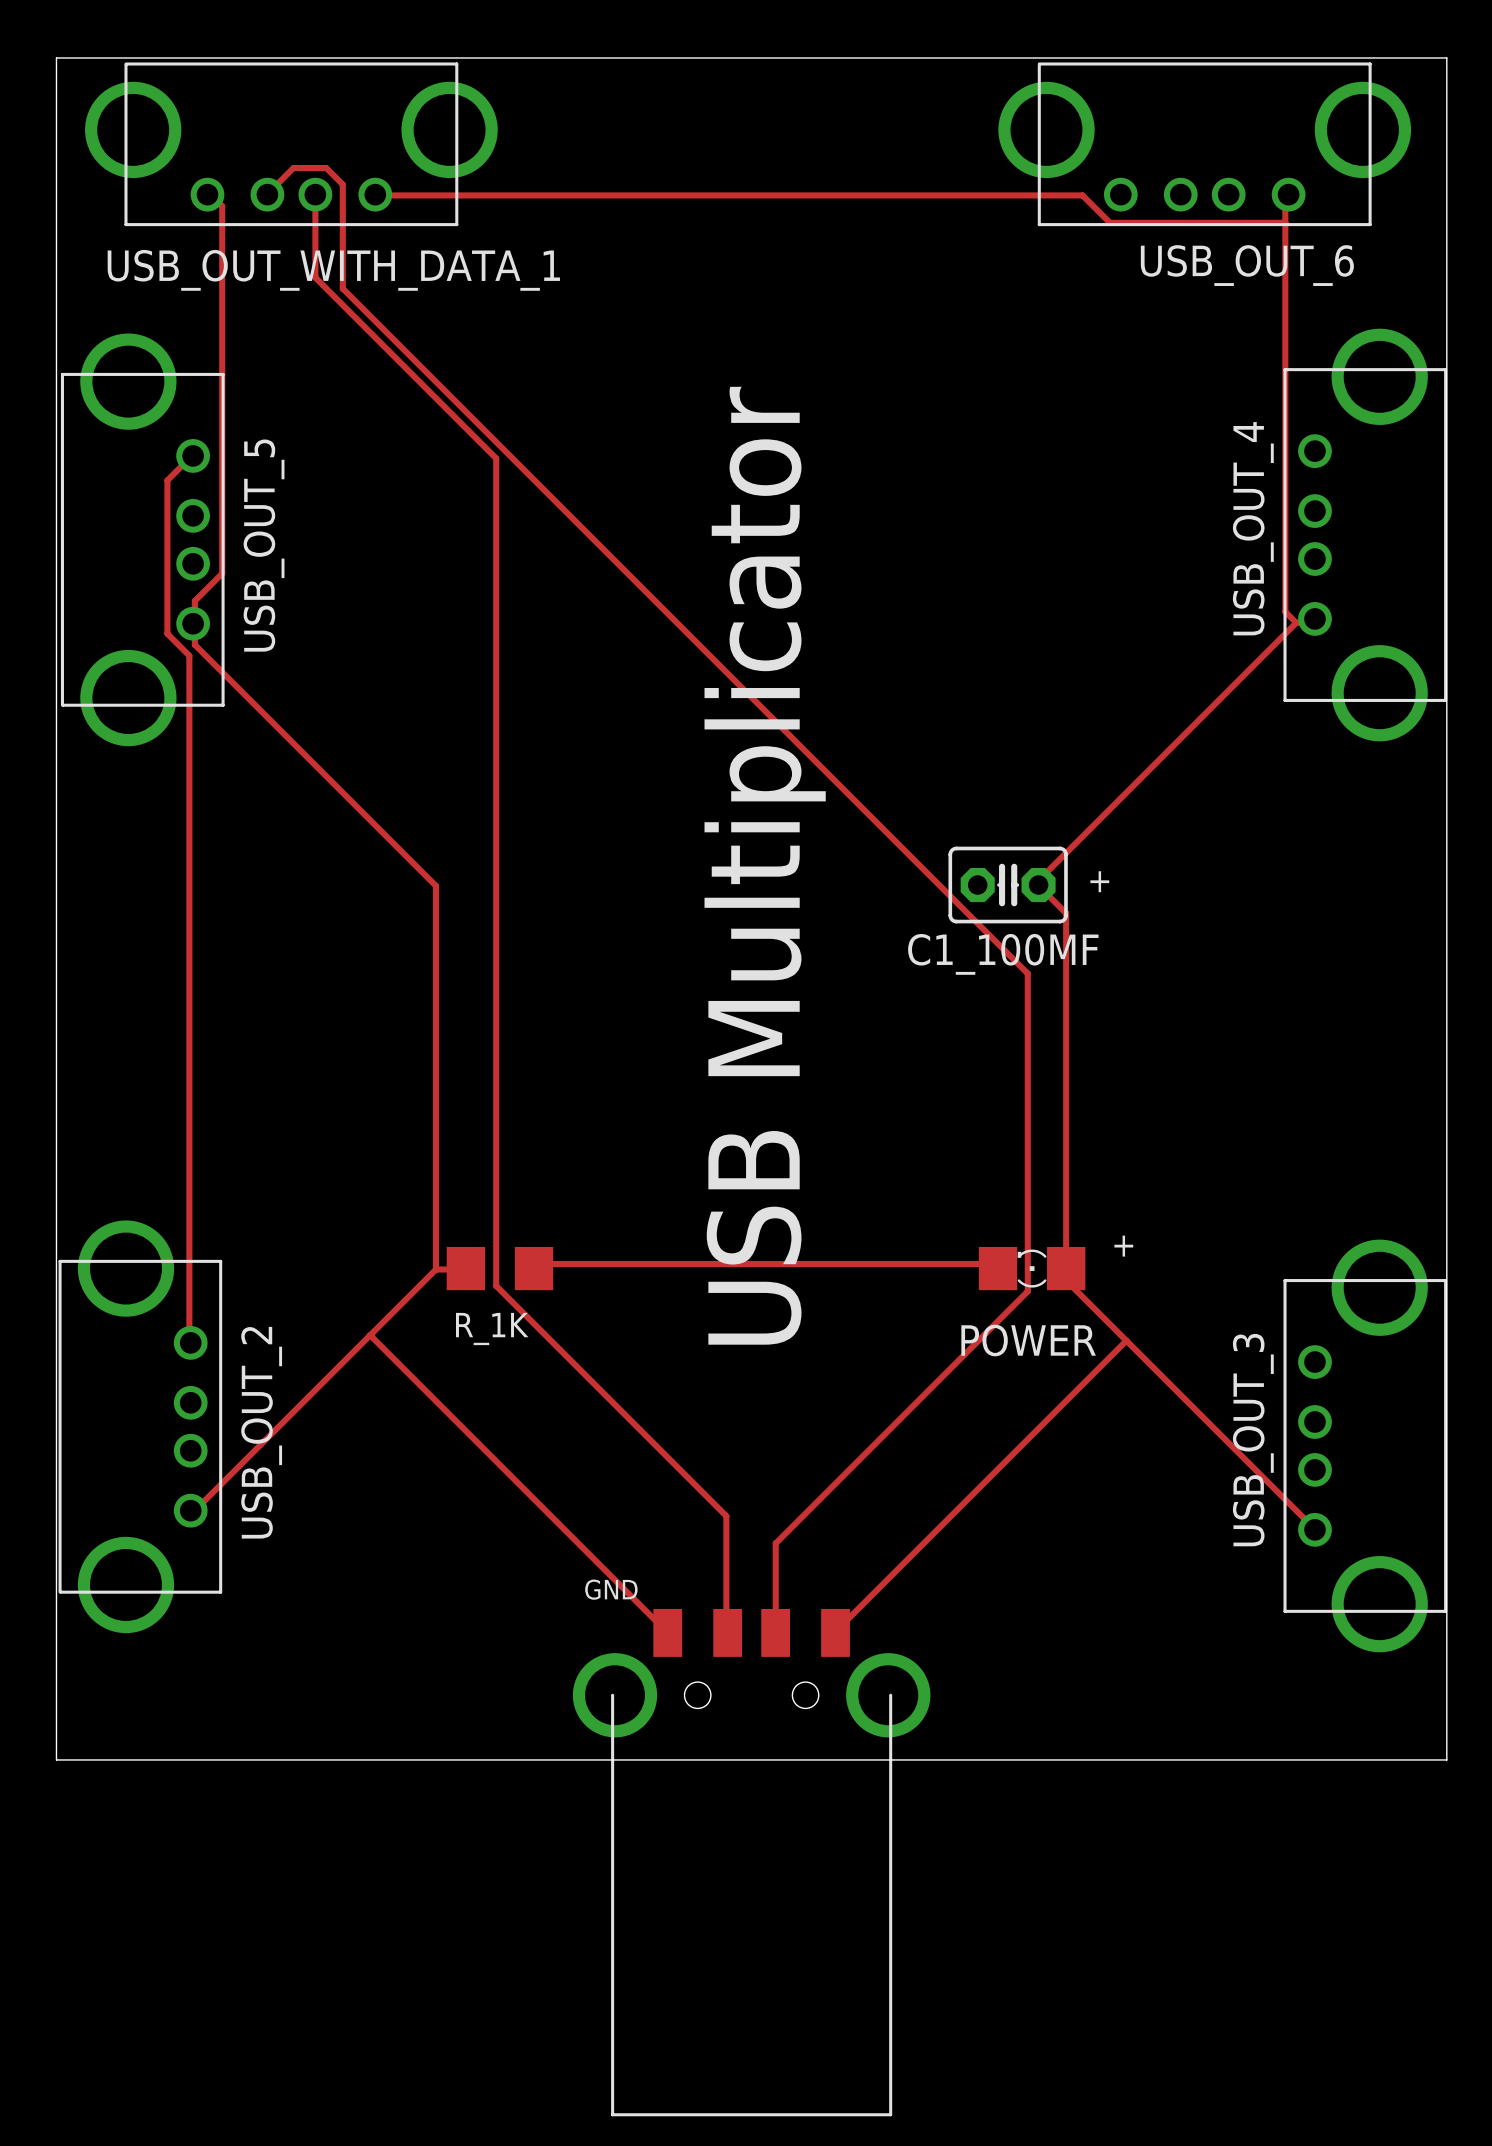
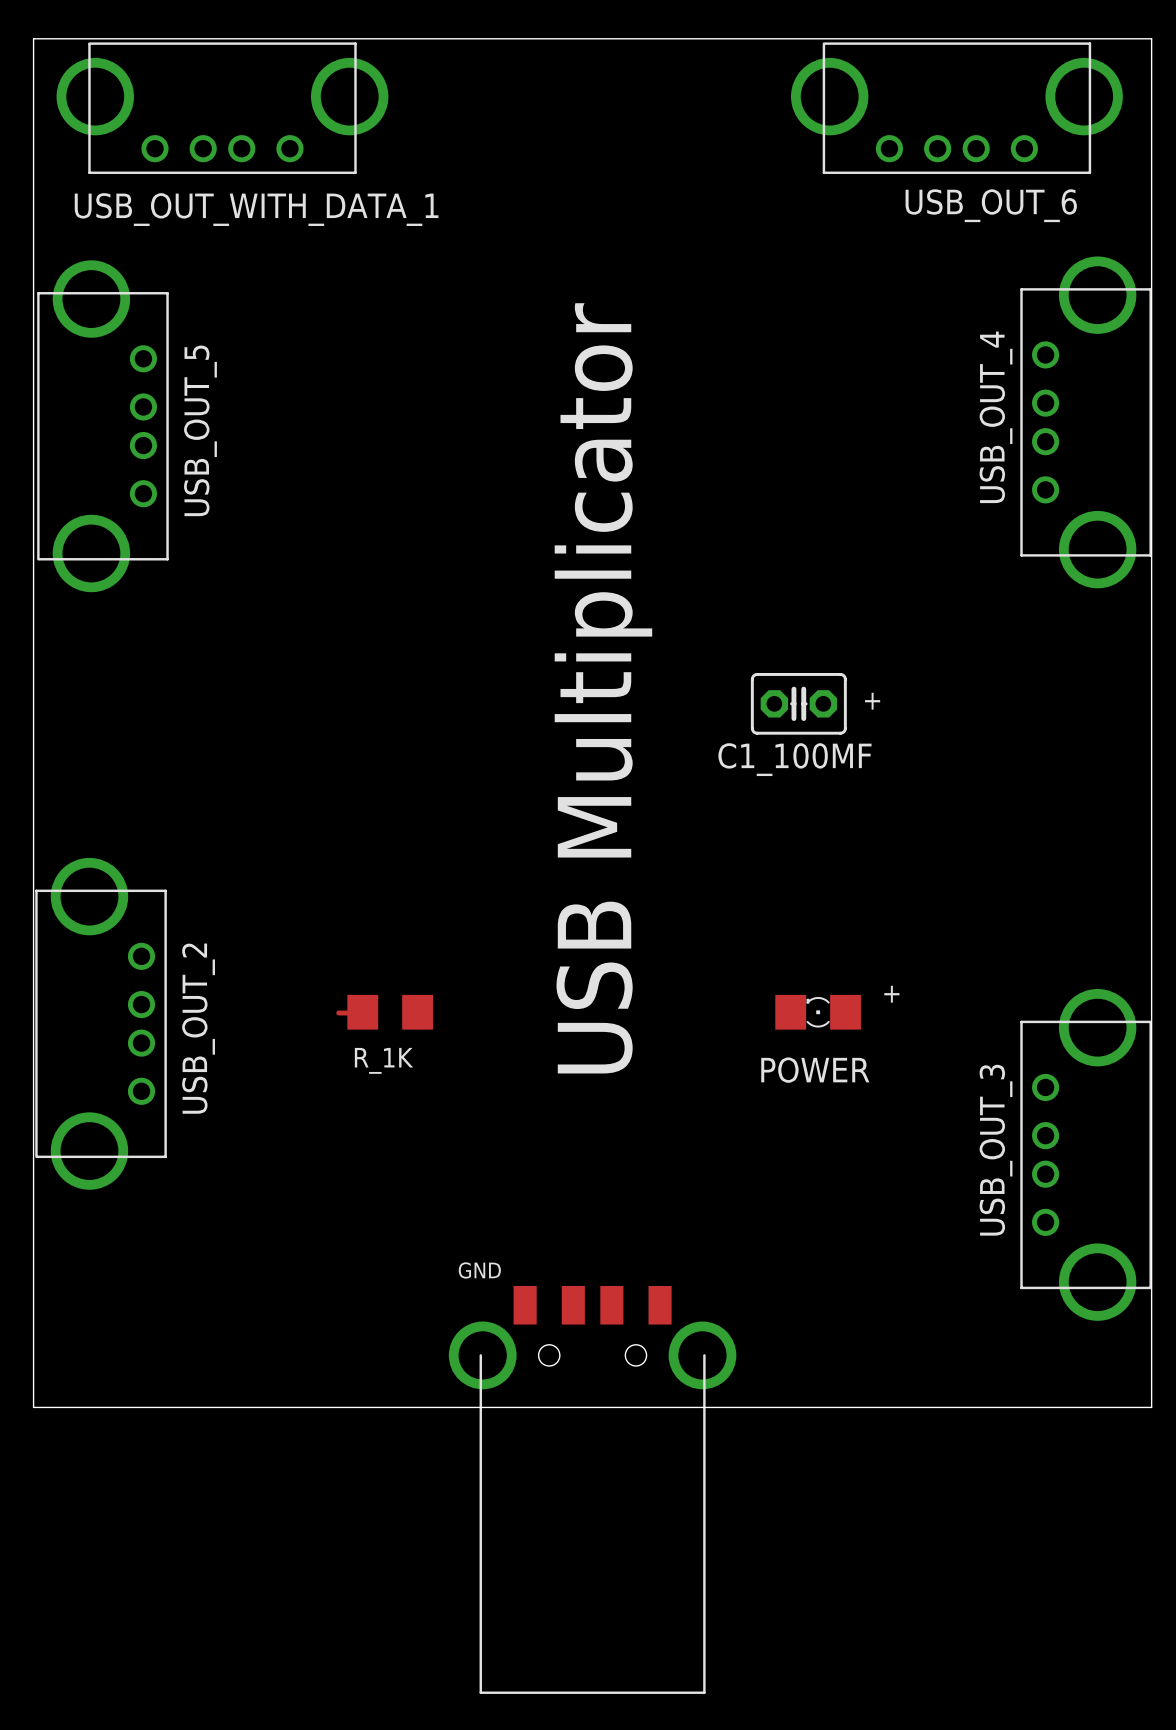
track: (207, 194) (211, 195) (222, 206) (222, 573) (194, 600) (194, 622) (193, 623) (194, 644) (435, 885) (435, 1269) (194, 1510) (190, 1510) -> none
track: (267, 194) (293, 168) (326, 168) (342, 184) (342, 288) (1027, 973) (1027, 1291) (775, 1543) (775, 1632) -> none
track: (315, 194) (315, 277) (496, 458) (496, 1285) (726, 1516) (727, 1632) -> none
track: (375, 194) (1082, 195) (1109, 222) (1285, 222) -> none
track: (1288, 194) (1285, 195) (1285, 611) (1296, 622) -> none
track: (193, 455) (167, 480) (167, 633) (189, 655) (190, 1342) -> none
track: (1296, 622) (1038, 880) (1038, 885) (1066, 913) (1066, 1268) (1071, 1269) (1071, 1285) (1314, 1529) -> none
track: (534, 1268) (534, 1264) (994, 1264) (998, 1268) -> none
track: (370, 1335) (667, 1632) -> none
track: (1126, 1340) (835, 1632) -> none
USB_OUT_2 position: (140, 1426) -> (101, 1023)

